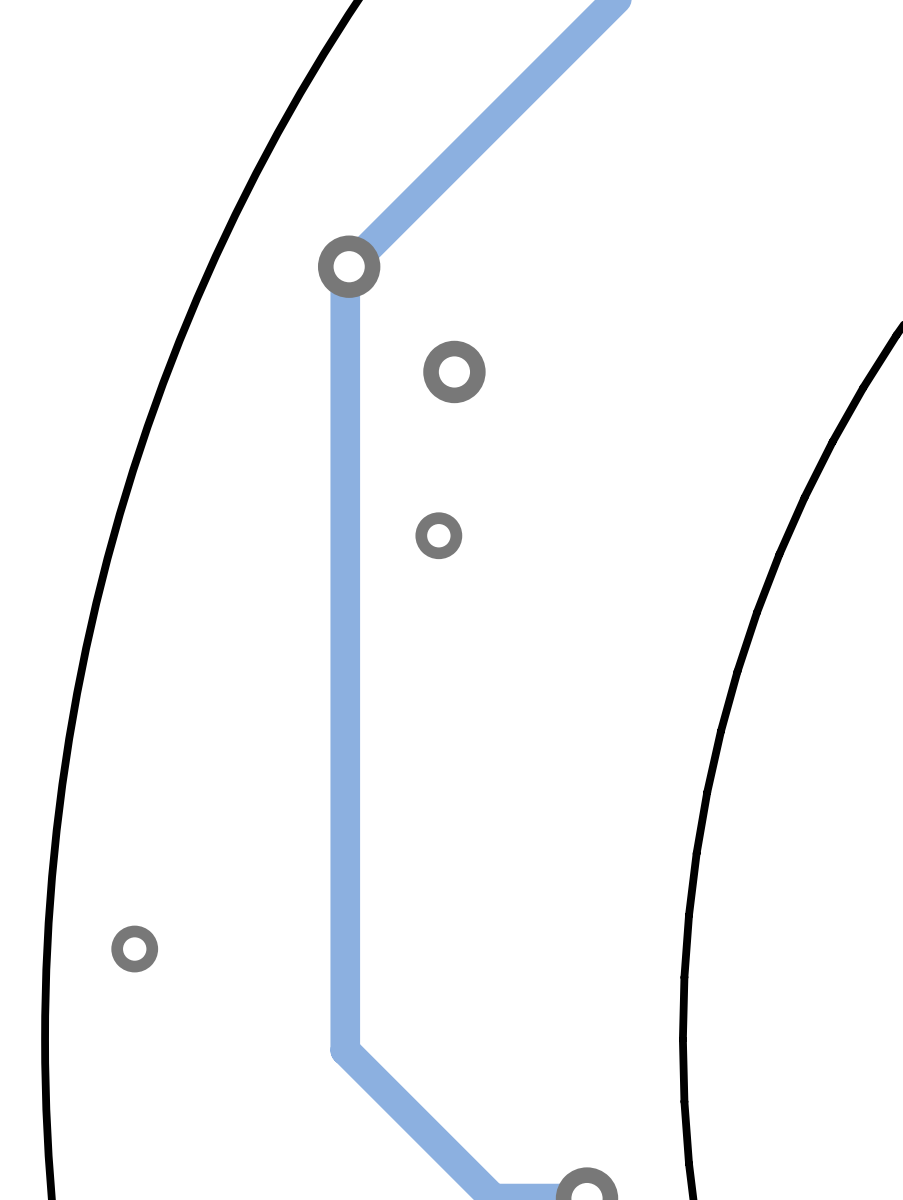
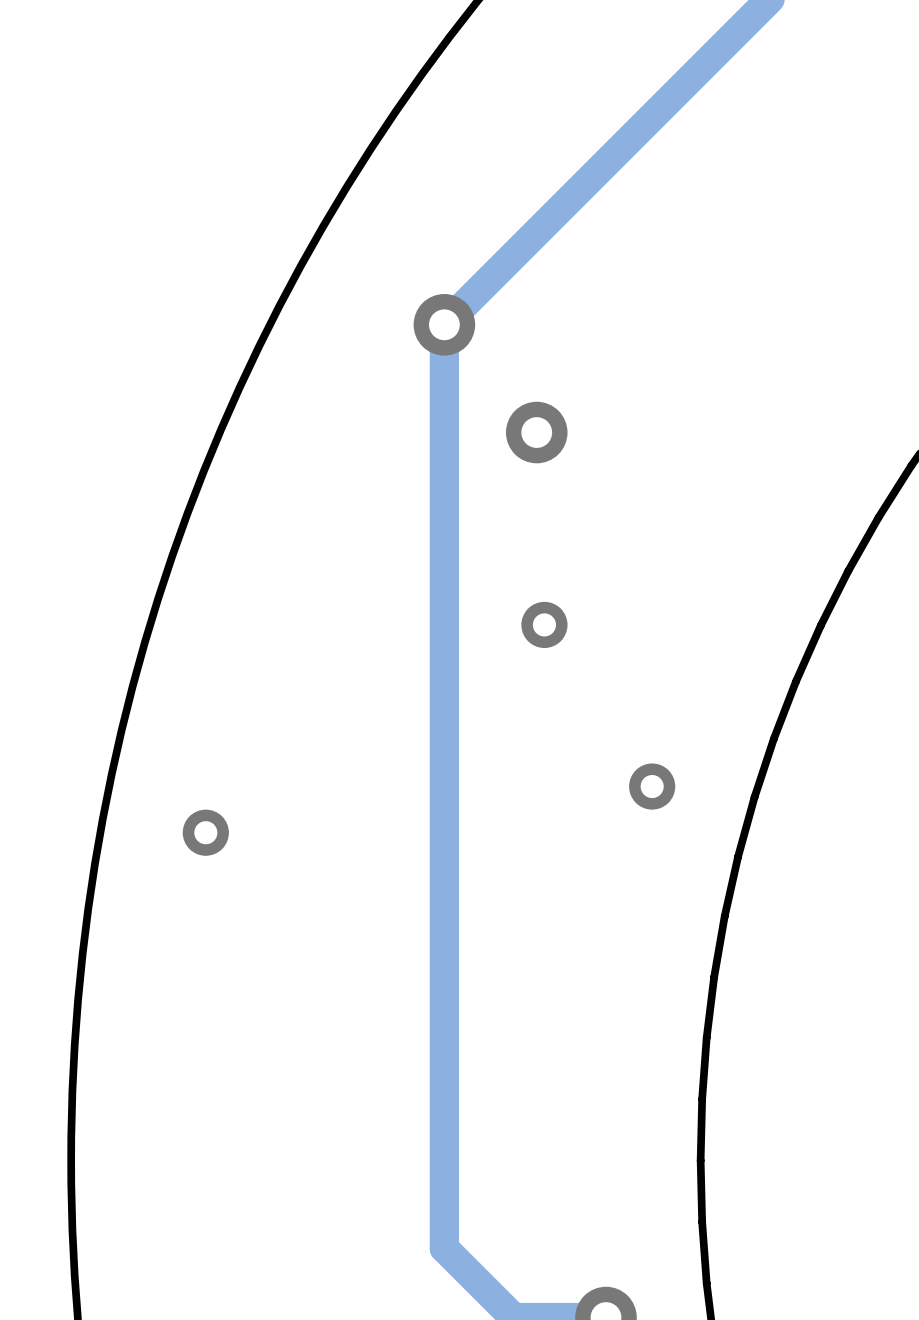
track: (423, 192) (345, 270) (345, 1050) (423, 1128) -> (444, 324) (444, 1248)
via: none -> (444, 324)
via: (349, 266) -> none
via: none -> (536, 432)
via: (454, 371) -> none
via position: (438, 535) -> (544, 624)
via: none -> (652, 786)
via: none -> (205, 832)
via: (134, 949) -> none

